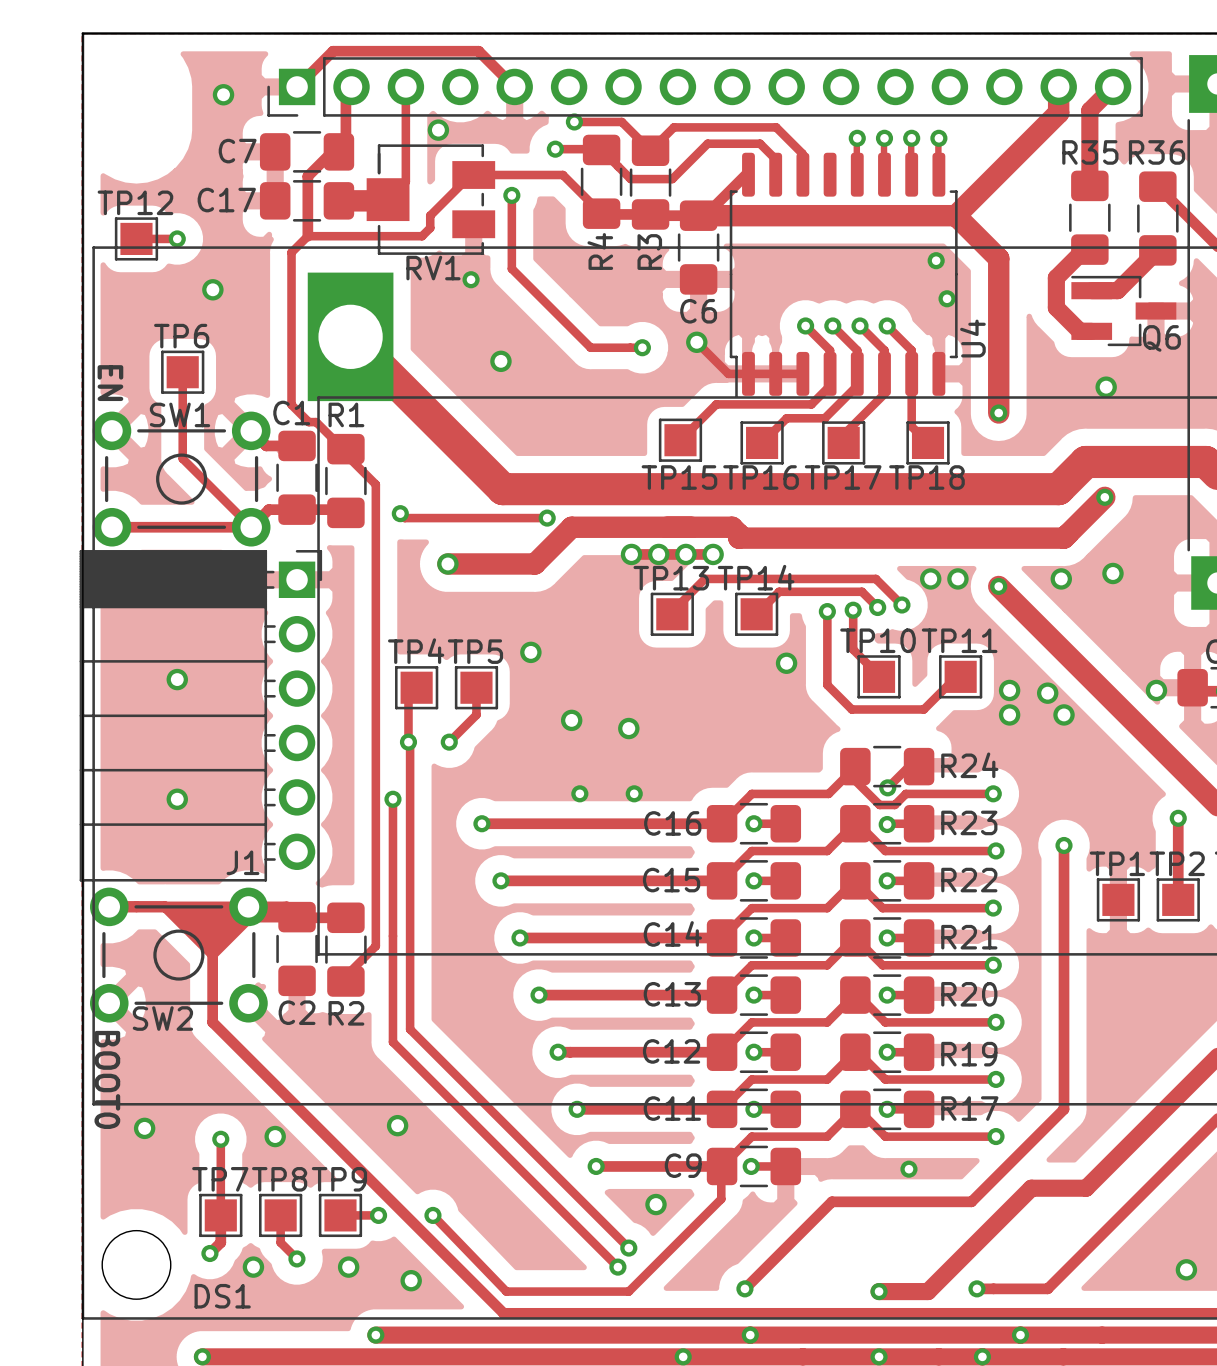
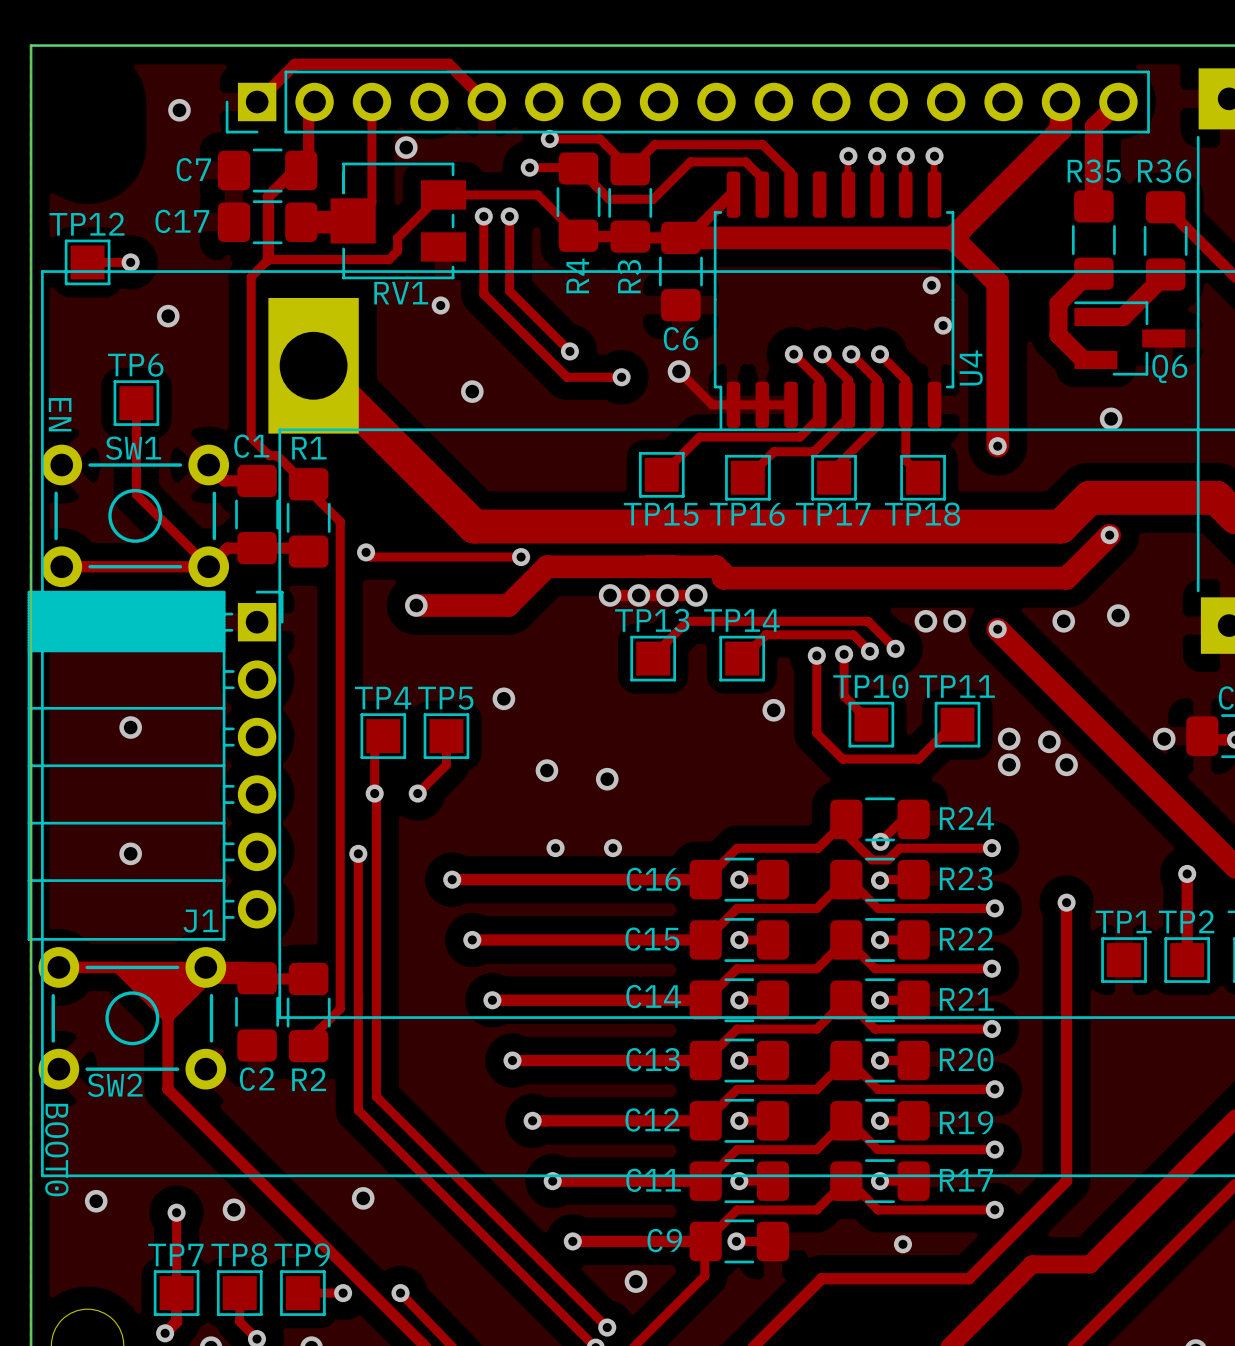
track: none -> (509, 216) (509, 291) (569, 351)
via: none -> (509, 216)
via: none -> (569, 351)

